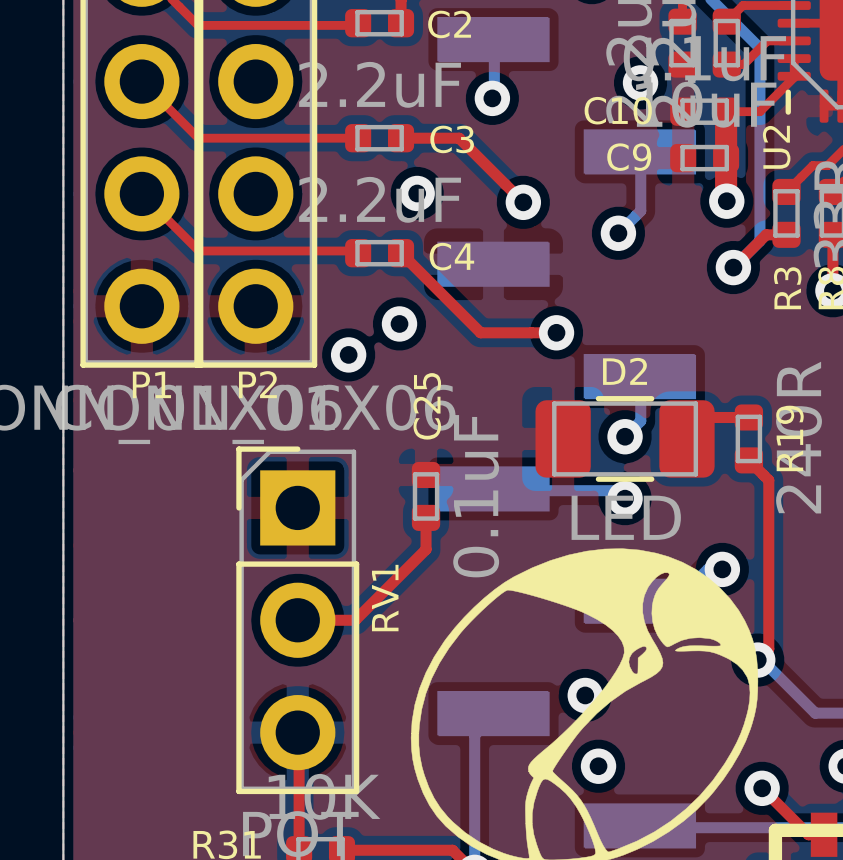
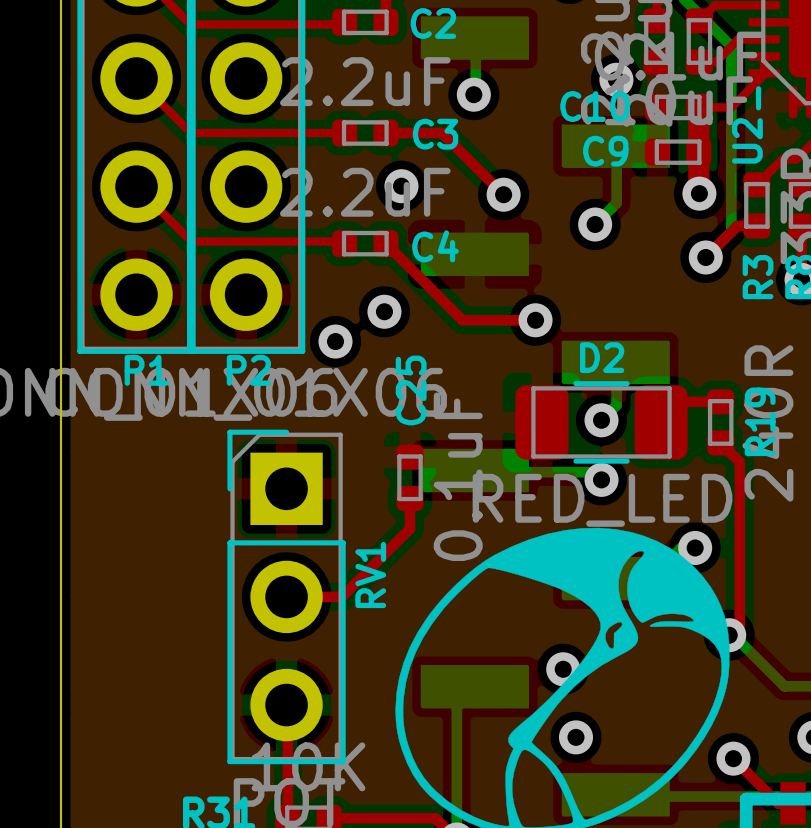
D2 value: LED (626, 517) -> RED_LED (602, 500)

